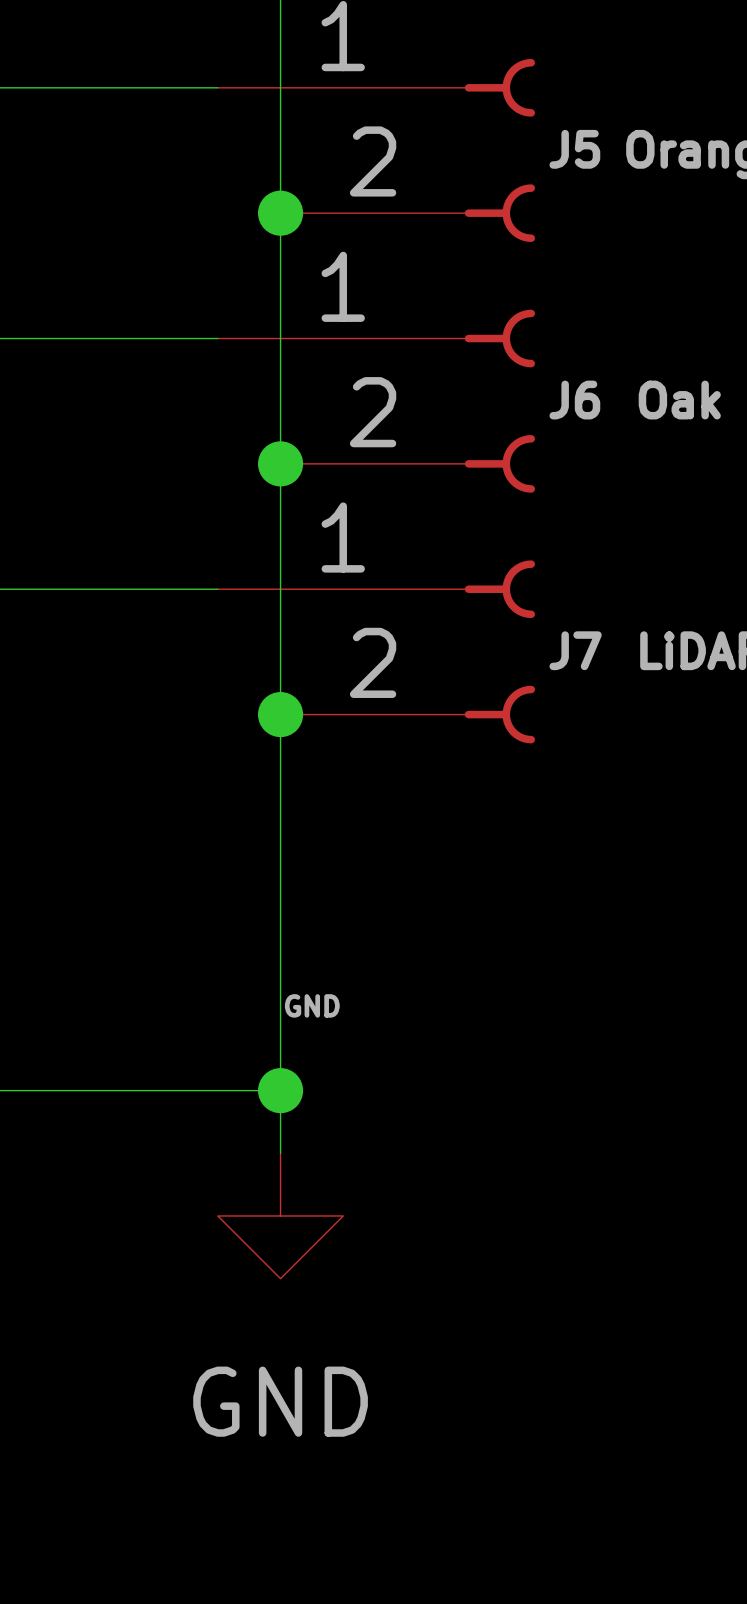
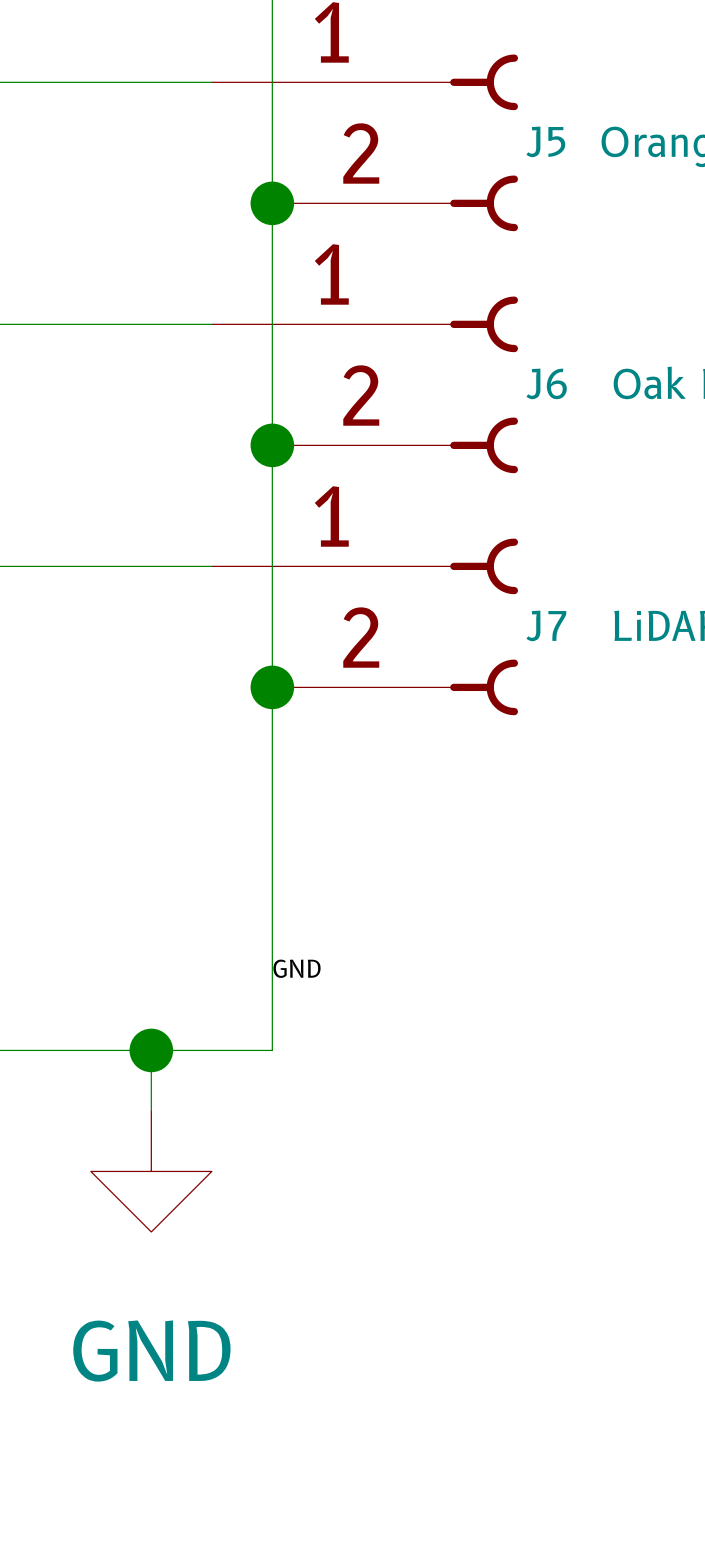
wire: (280, 1090) (280, 1153) -> (151, 1050) (151, 1110)
junction position: (280, 1090) -> (151, 1050)
power symbol position: GND (280, 1215) -> GND (151, 1171)

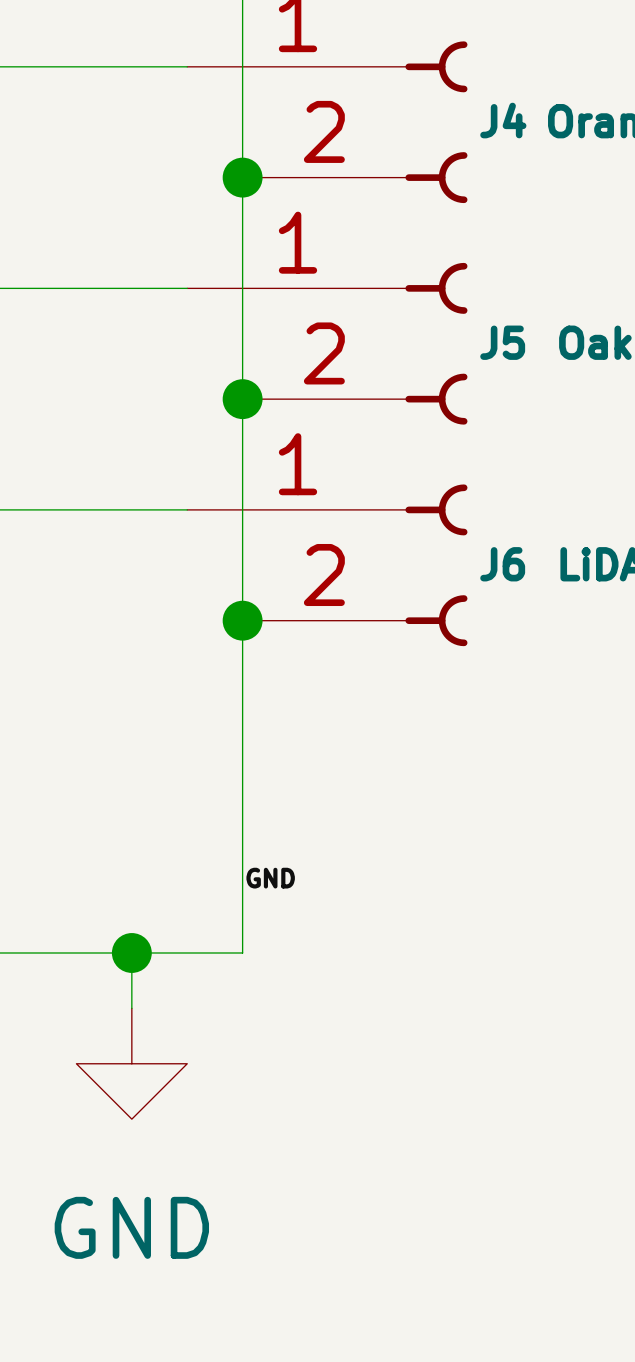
J5 name: J5 (545, 141) -> J4 (503, 120)
J6 name: J6 (546, 383) -> J5 (502, 342)
J7 name: J7 (546, 625) -> J6 (502, 564)

